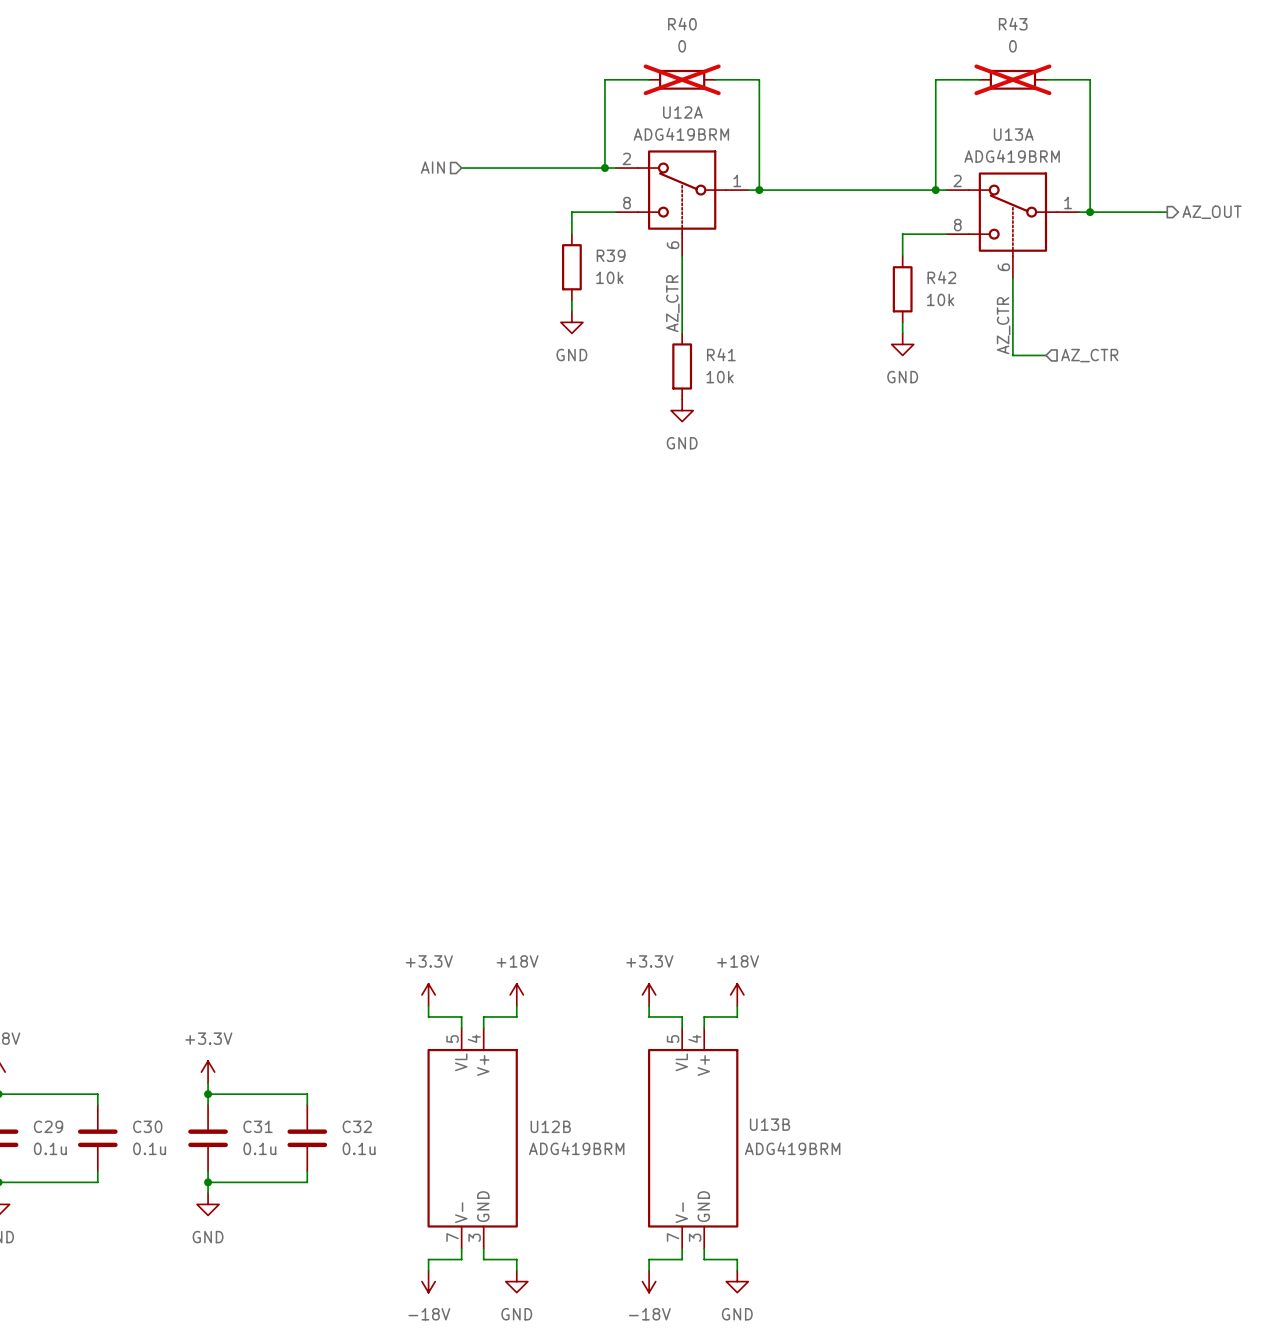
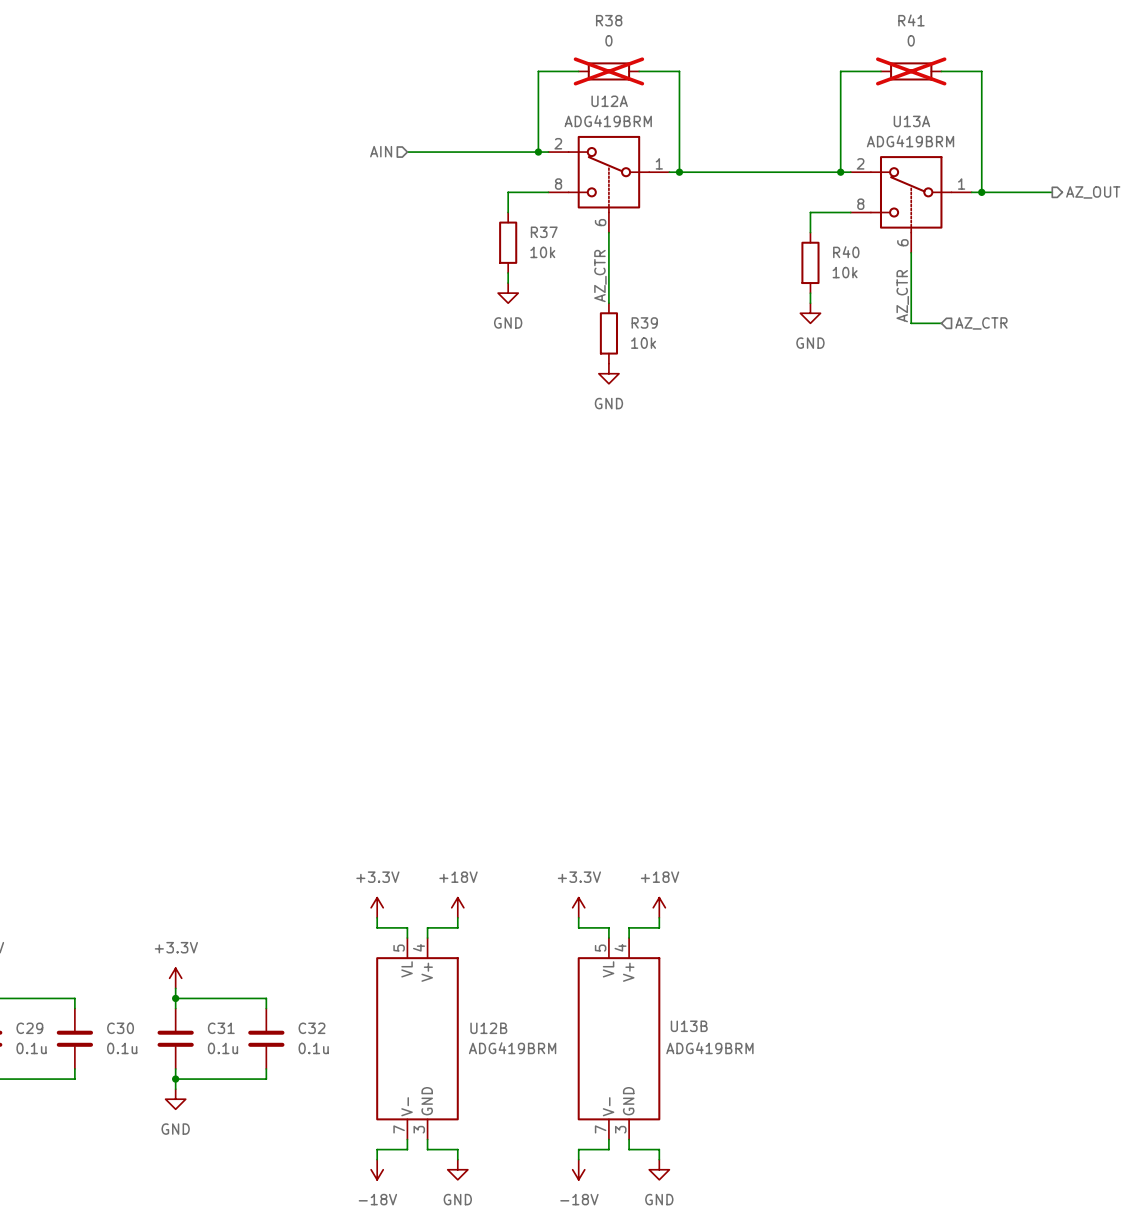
R40 name: R40 (682, 24) -> R38 (609, 20)
R43 name: R43 (1013, 24) -> R41 (911, 20)
R39 name: R39 (611, 255) -> R37 (544, 232)
R42 name: R42 (941, 277) -> R40 (846, 252)
R41 name: R41 (721, 354) -> R39 (644, 322)

